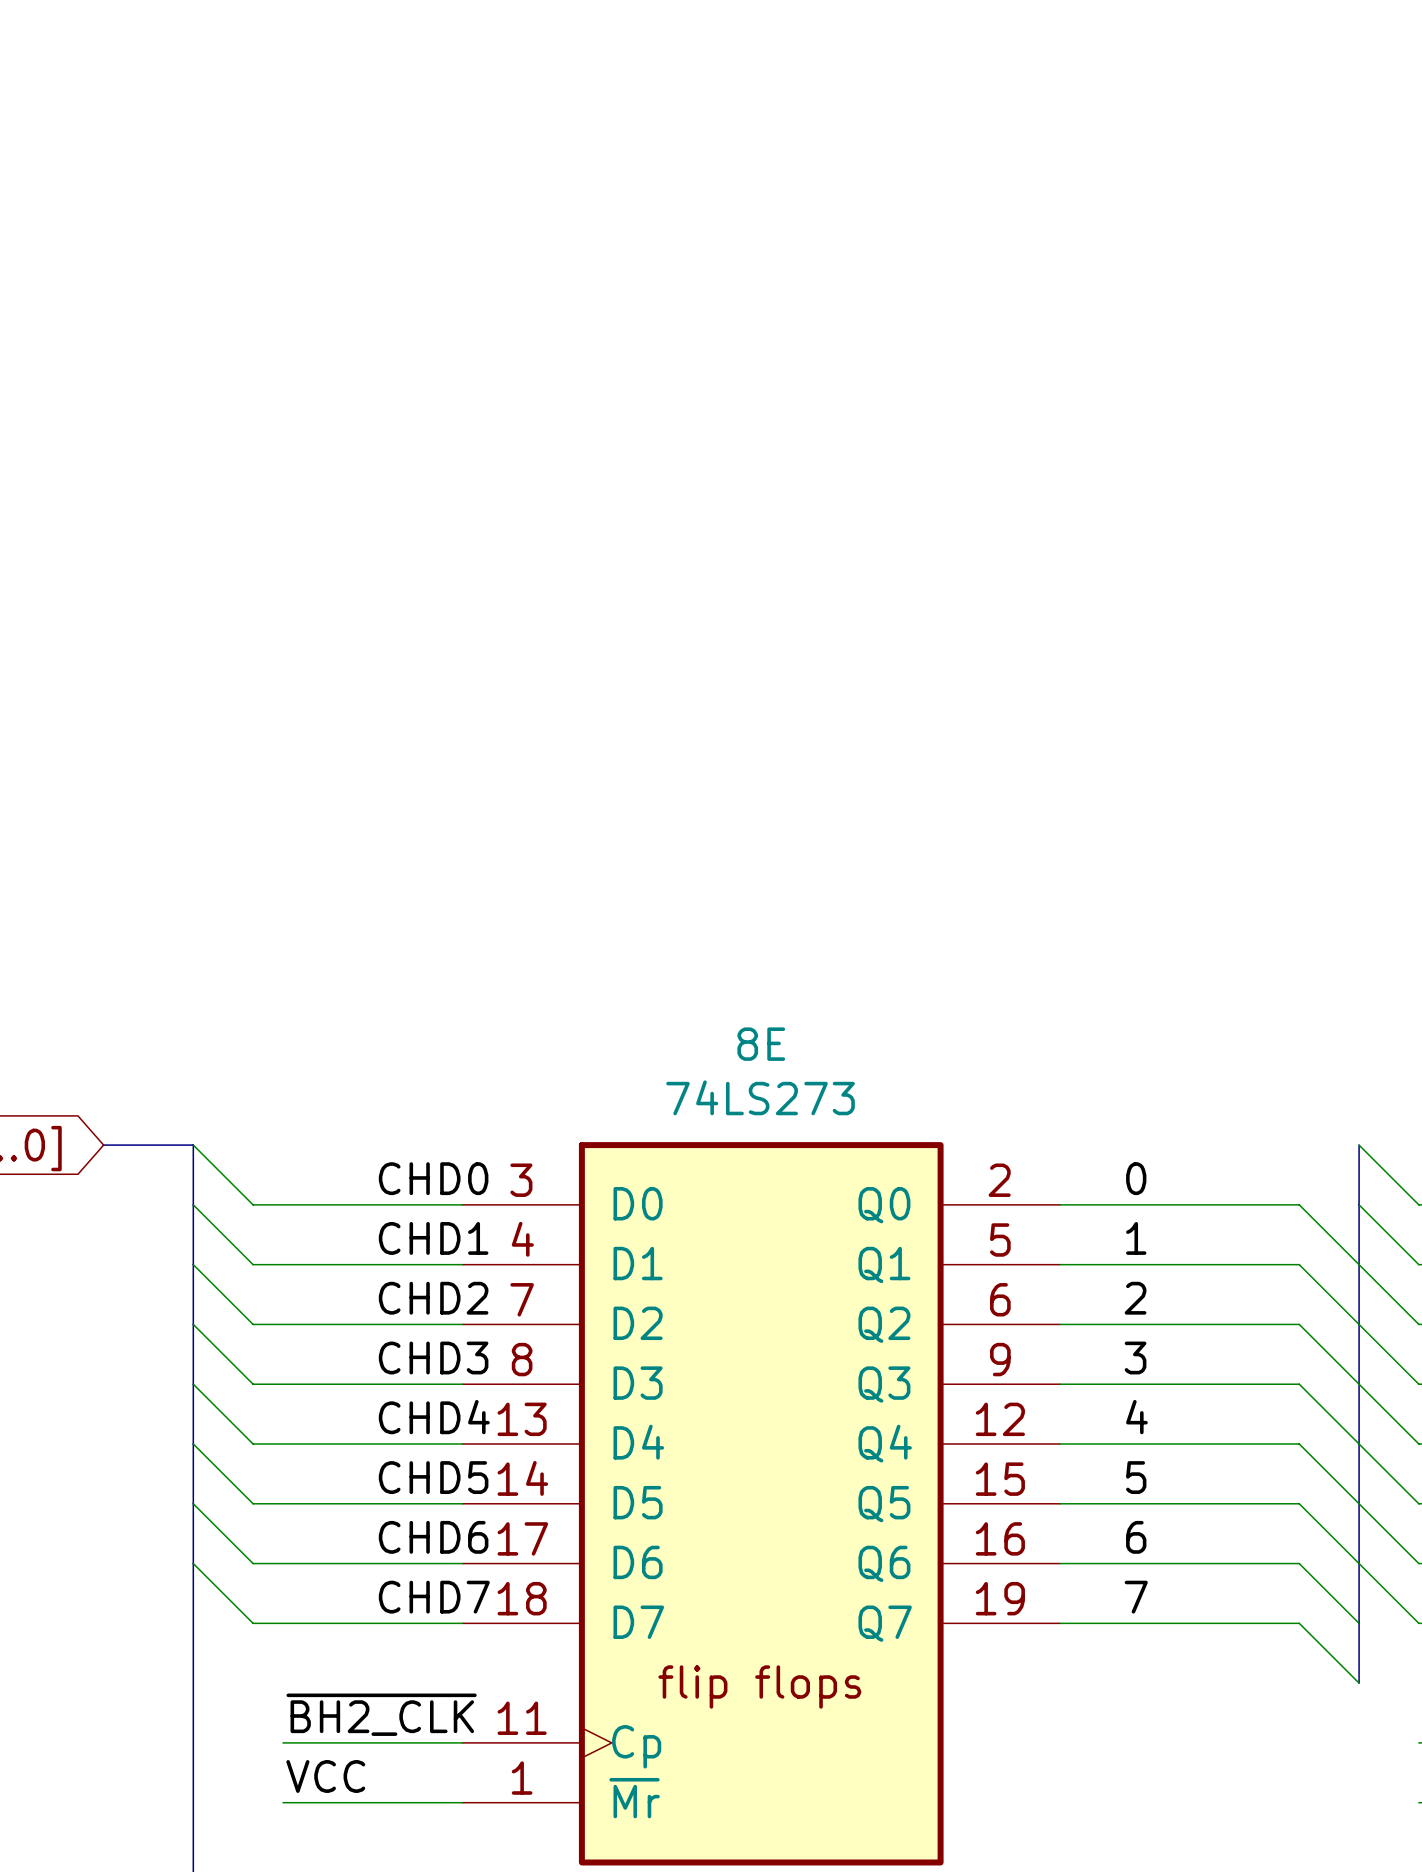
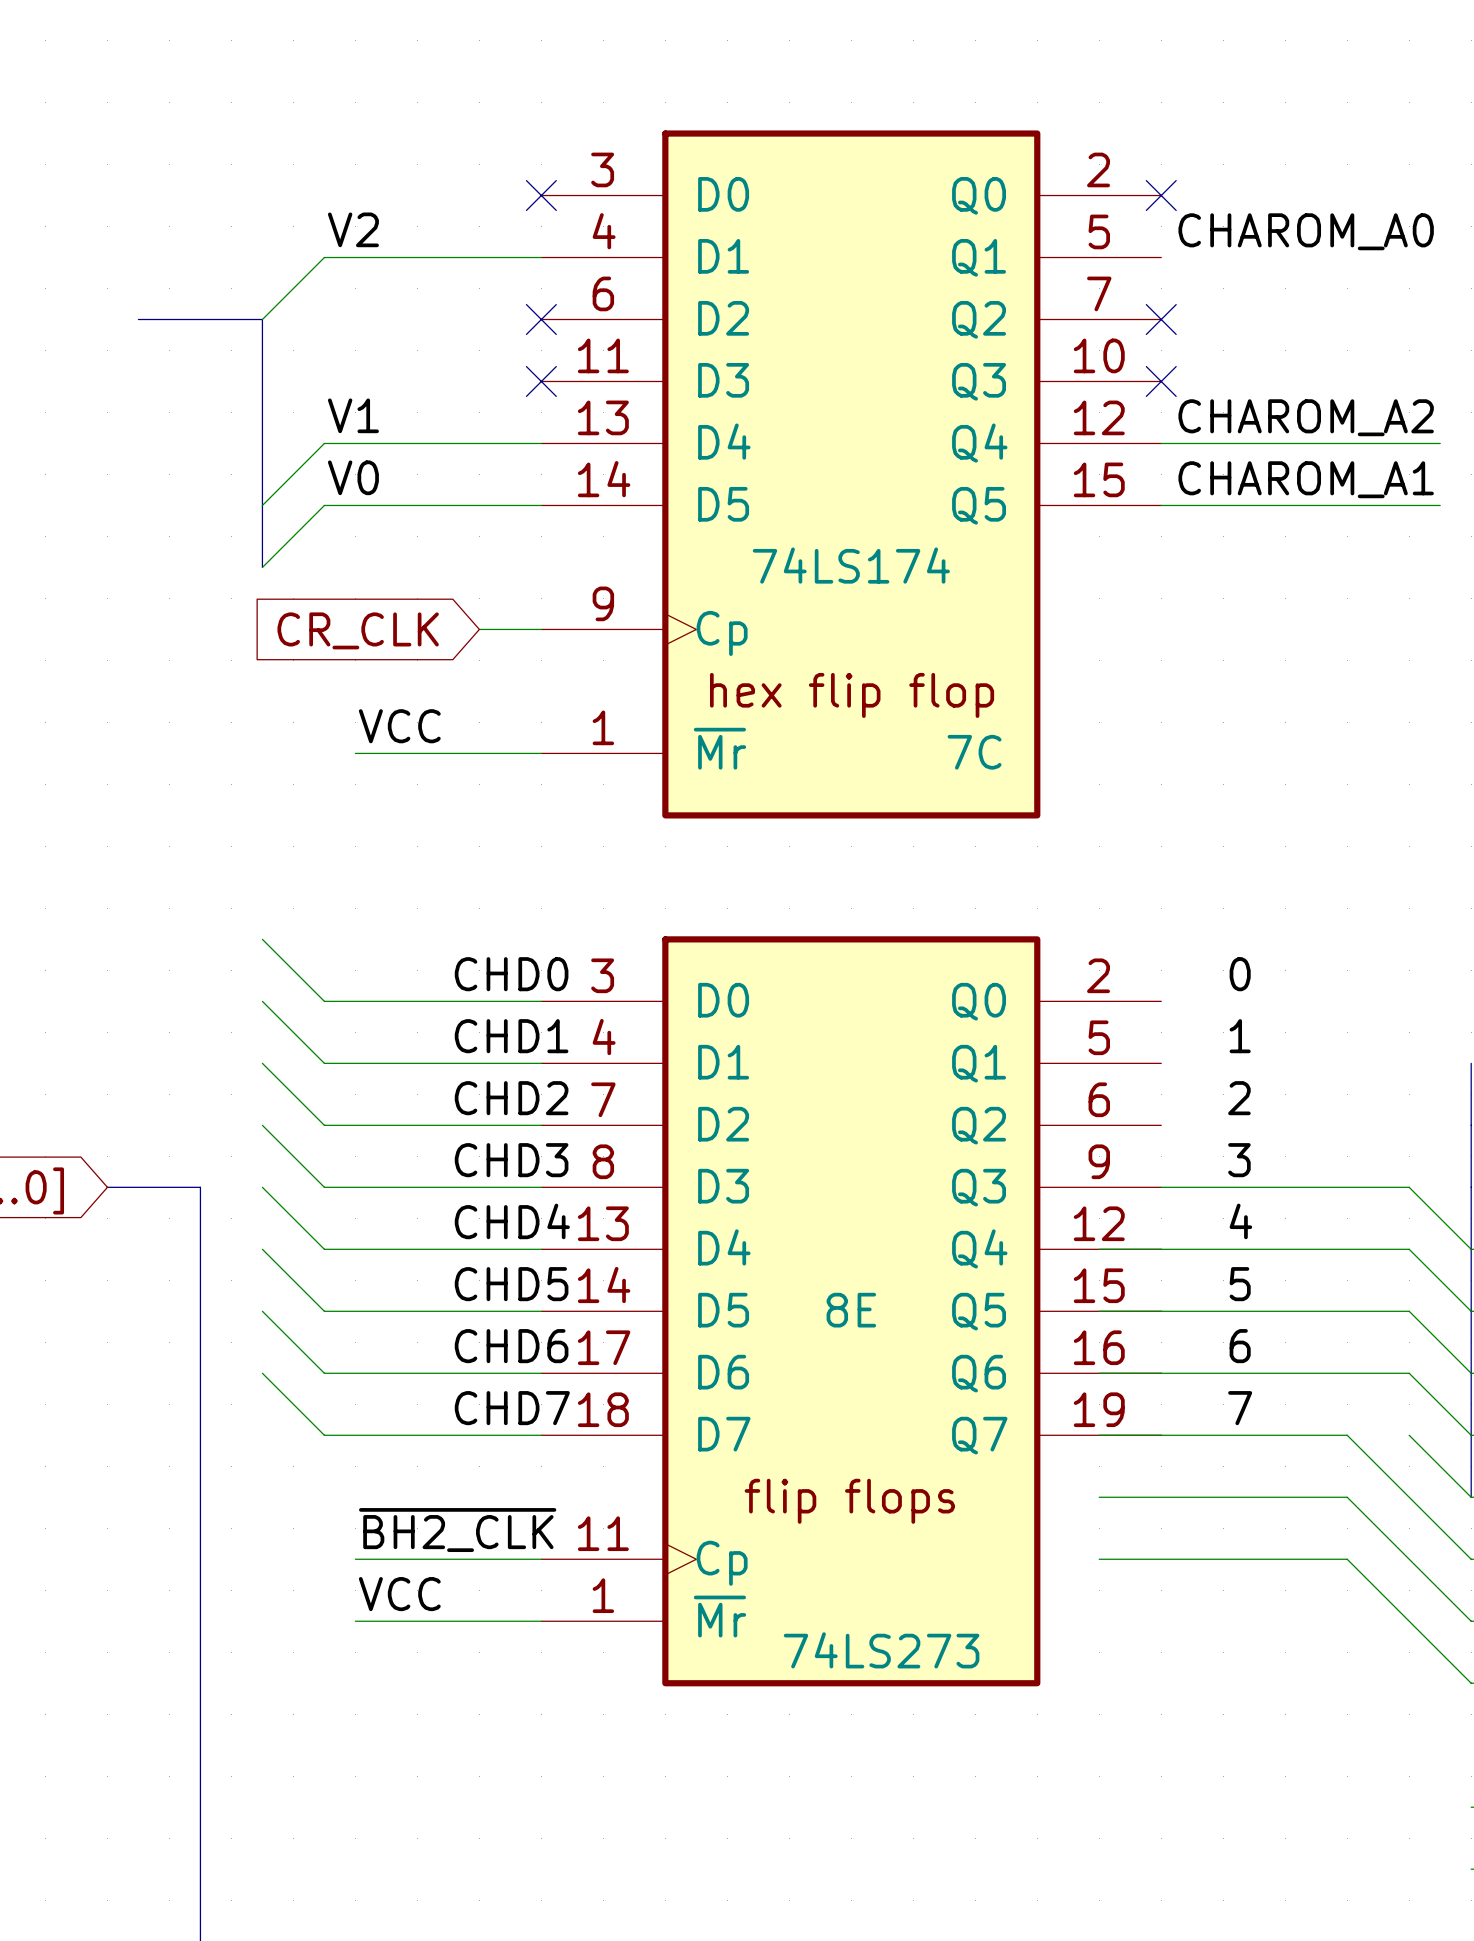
no-connect mark: none -> (541, 195)
no-connect mark: none -> (1161, 195)
label: none -> V2 (353, 229)
label: none -> CHAROM_A0 (1306, 231)
wire: none -> (541, 257) (324, 257) (262, 319)
bus: none -> (138, 319) (262, 319) (262, 567)
no-connect mark: none -> (541, 319)
no-connect mark: none -> (1161, 319)
no-connect mark: none -> (541, 381)
no-connect mark: none -> (1161, 381)
label: none -> V1 (353, 415)
label: none -> CHAROM_A2 (1306, 417)
wire: none -> (541, 443) (324, 443) (262, 505)
wire: none -> (1161, 443) (1440, 443)
7C: none -> 74LS174 (851, 474)
label: none -> V0 (353, 477)
label: none -> CHAROM_A1 (1306, 479)
wire: none -> (541, 505) (324, 505) (262, 567)
wire: none -> (1161, 505) (1440, 505)
wire: none -> (479, 629) (541, 629)
global label: none -> CR_CLK (358, 630)
label: none -> VCC (399, 726)
wire: none -> (355, 753) (541, 753)
label: none -> 0 (1240, 974)
wire: none -> (262, 1001) (324, 1063) (541, 1063)
label: none -> 1 (1240, 1036)
wire: none -> (262, 1063) (324, 1125) (541, 1125)
bus: none -> (1471, 1063) (1471, 1497)
8E name position: 8E (761, 1044) -> 8E (851, 1310)
label: none -> 2 (1239, 1098)
8E value position: 74LS273 (760, 1097) -> 74LS273 (881, 1650)
label: none -> 3 (1239, 1160)
wire: (193, 1145) (253, 1204) (312, 1204) -> (262, 1187) (324, 1249)
wire: none -> (1161, 1187) (1409, 1187)
bus: (1359, 1145) (1359, 1683) -> none
label: none -> 4 (1240, 1221)
label position: CHD0 (433, 1178) -> CHD0 (511, 974)
label: 0 (1136, 1178) -> none
wire: (193, 1204) (253, 1264) (312, 1264) -> (262, 1249) (324, 1311)
wire: (1299, 1204) (1359, 1264) -> (1347, 1249) (1409, 1249)
label position: CHD1 (433, 1238) -> CHD1 (511, 1036)
label: 1 (1136, 1238) -> none
label: none -> 5 (1240, 1284)
wire: (193, 1264) (253, 1324) (312, 1324) -> (262, 1311) (324, 1373)
wire: (1299, 1264) (1359, 1324) -> (1347, 1311) (1409, 1311)
label position: CHD2 (433, 1298) -> CHD2 (511, 1098)
label: 2 (1135, 1298) -> none
wire: (193, 1324) (253, 1384) (312, 1384) -> (262, 1373) (324, 1435)
wire: (1299, 1324) (1359, 1384) -> (1347, 1373) (1409, 1373)
label position: CHD3 (433, 1358) -> CHD3 (511, 1160)
label: 3 (1135, 1358) -> none
label: none -> 7 (1240, 1408)
wire: (193, 1384) (253, 1444) (462, 1444) -> (262, 939) (324, 1001) (541, 1001)
label position: CHD4 (434, 1417) -> CHD4 (512, 1221)
label: 4 (1136, 1417) -> none
wire: (193, 1444) (253, 1503) (342, 1503) -> none
label position: CHD5 (433, 1477) -> CHD5 (511, 1284)
label: 5 (1136, 1477) -> none
wire: (193, 1503) (253, 1563) (342, 1563) -> none
8E position: (761, 1503) -> (851, 1311)
label position: CHD6 (433, 1537) -> CHD6 (511, 1346)
label position: 6 (1136, 1537) -> 6 (1240, 1346)
wire: (193, 1563) (253, 1623) (462, 1623) -> (262, 1125) (324, 1187) (541, 1187)
wire: (1060, 1563) (1299, 1563) (1359, 1623) -> none
label position: CHD7 (434, 1597) -> CHD7 (512, 1408)
label: 7 (1136, 1597) -> none
wire: (1060, 1623) (1299, 1623) (1359, 1683) -> none
label position: ~{BH2_CLK} (381, 1714) -> ~{BH2_CLK} (457, 1530)
wire: (282, 1742) (462, 1742) -> none
label position: VCC (325, 1776) -> VCC (399, 1594)
wire: (282, 1802) (462, 1802) -> none

